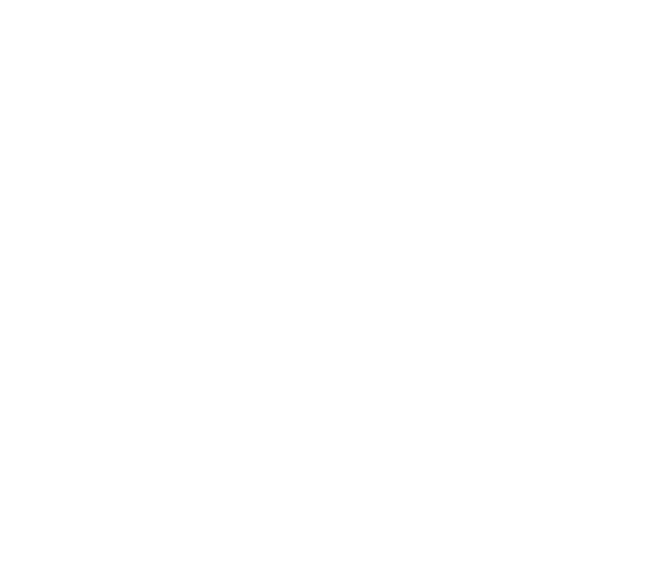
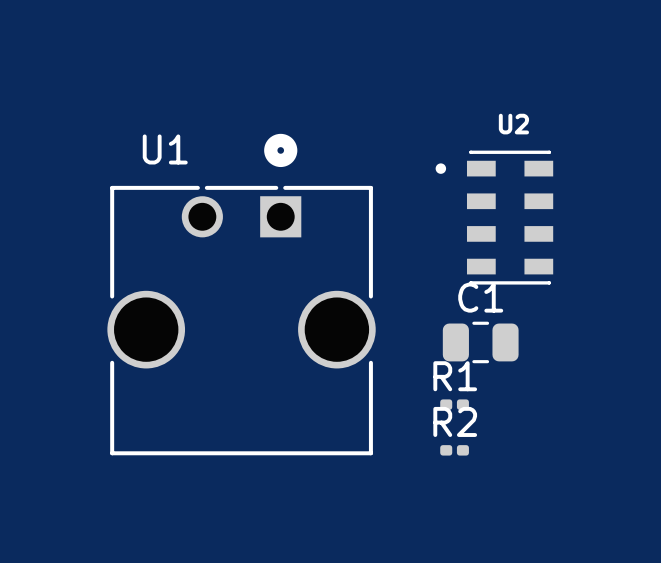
U2: none -> (494, 217)
U1: none -> (241, 294)
C1: none -> (480, 342)
R1: none -> (454, 404)
R2: none -> (454, 450)

